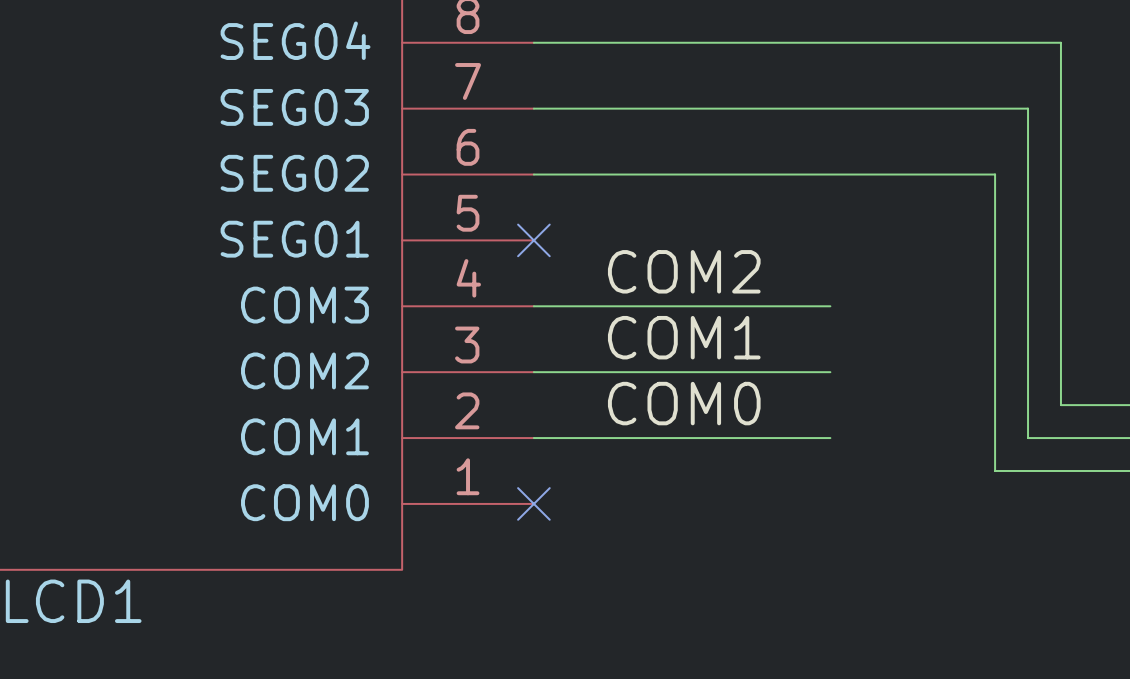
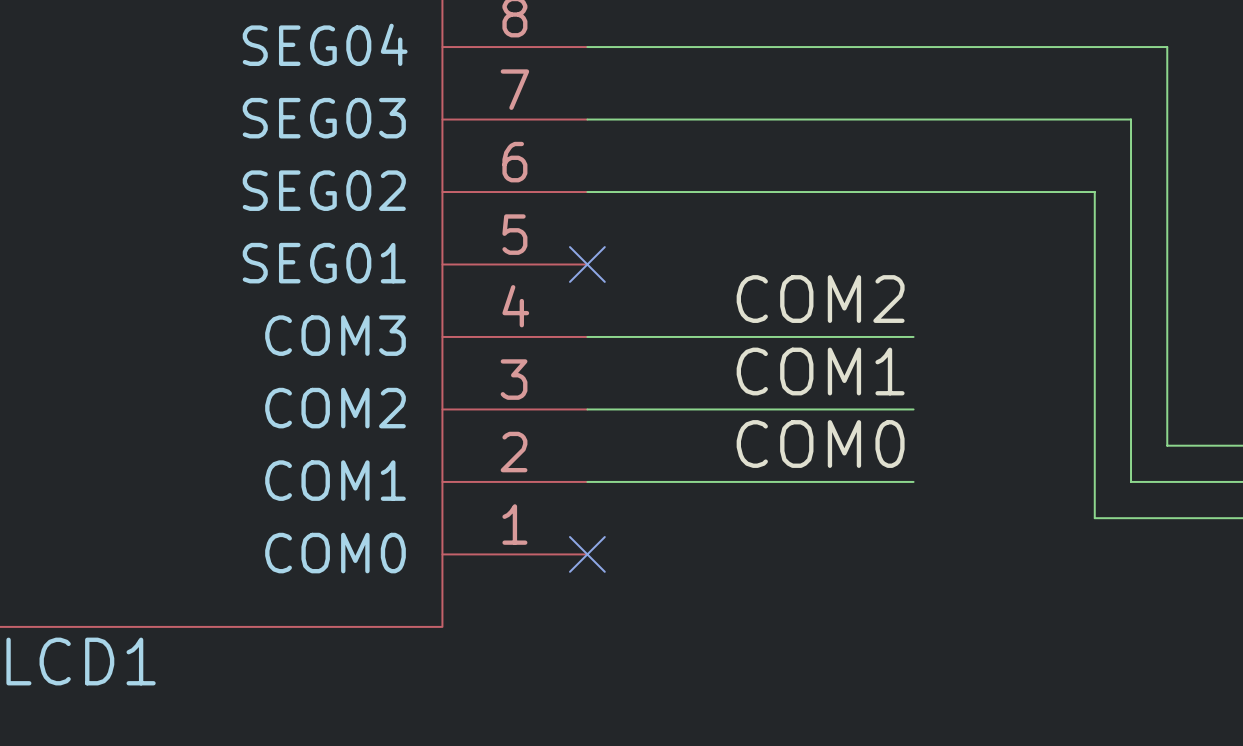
label position: COM2 (684, 271) -> COM2 (820, 299)
label position: COM1 (684, 337) -> COM1 (820, 371)
label position: COM0 (684, 403) -> COM0 (820, 444)

